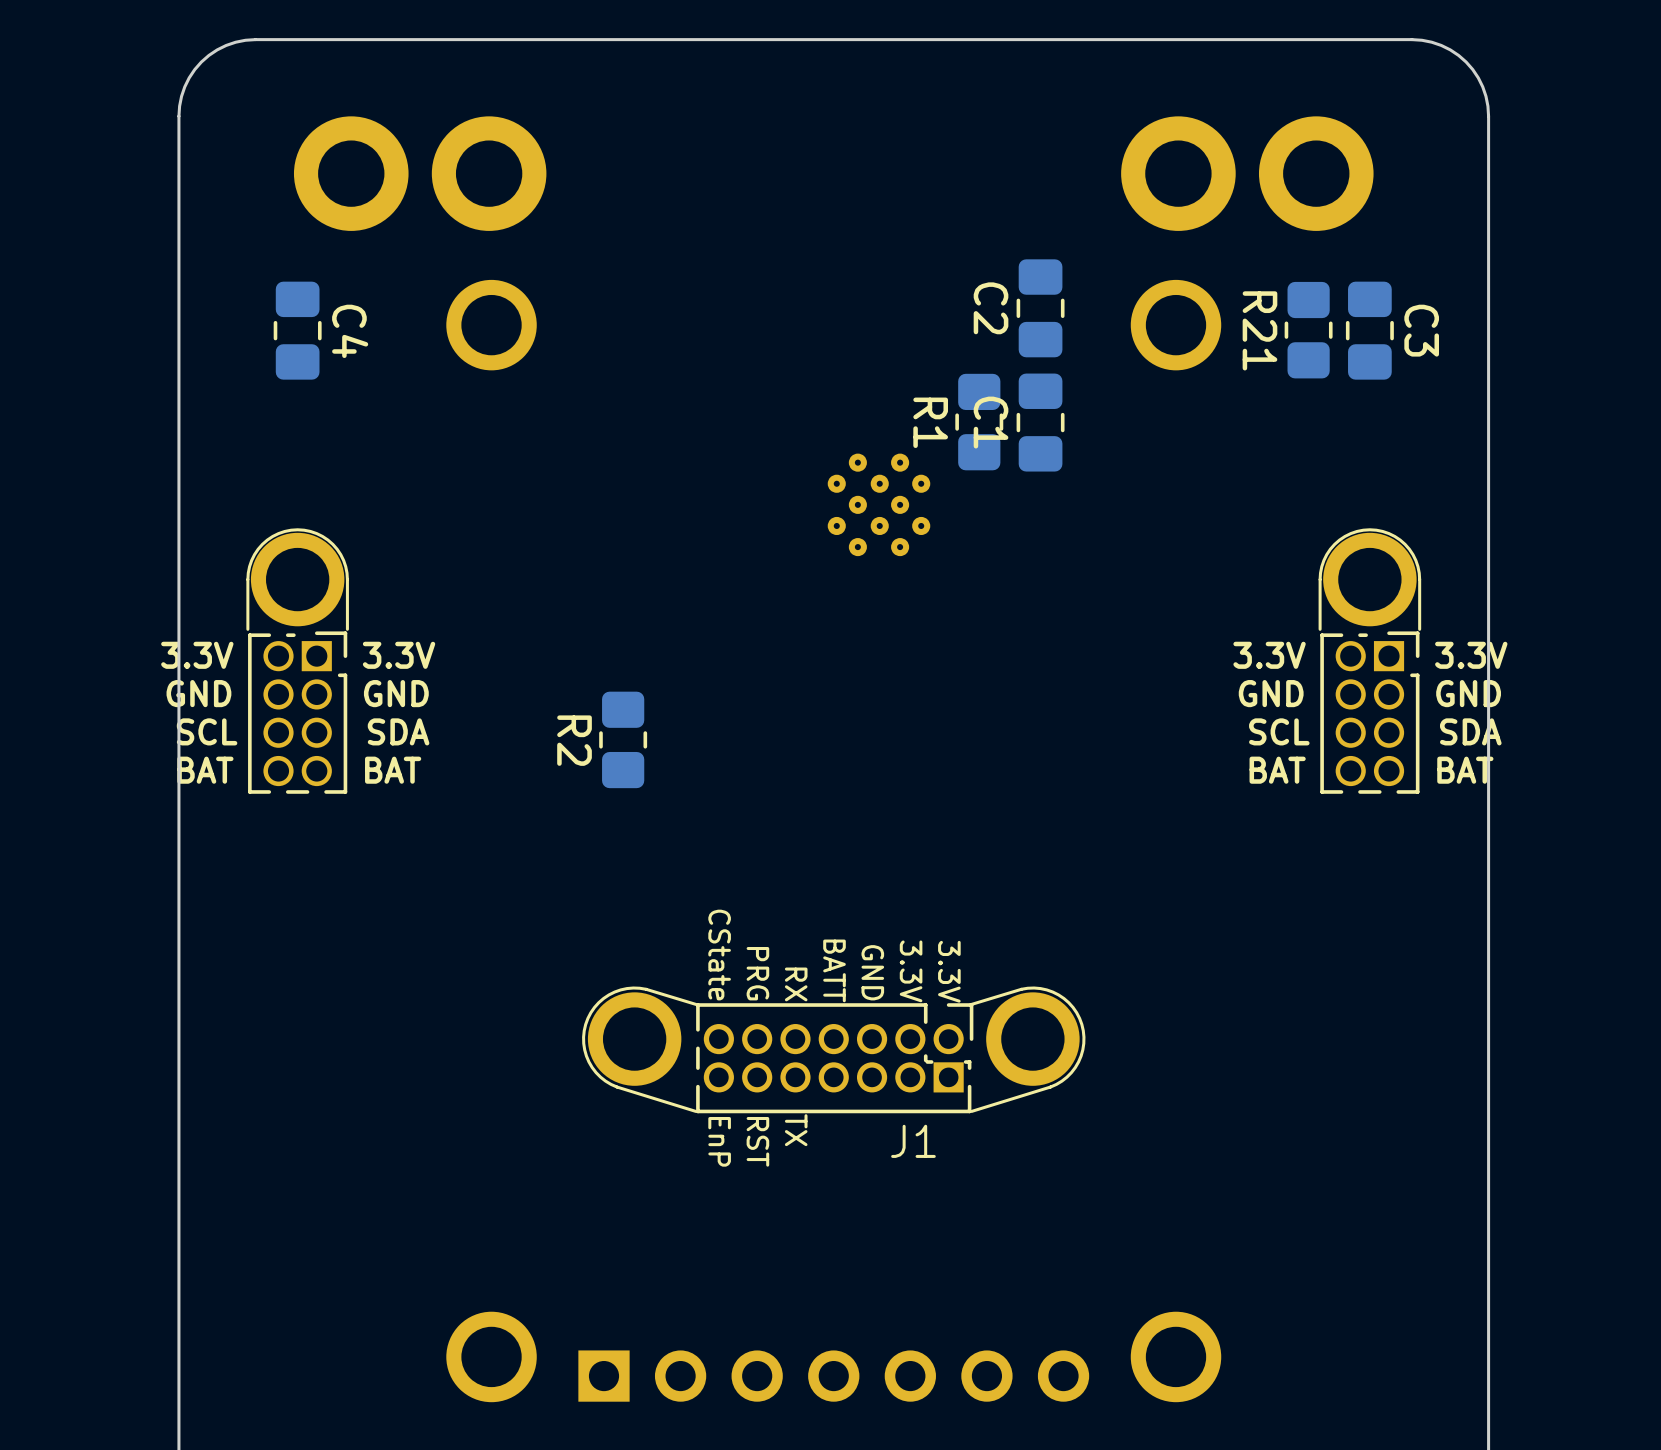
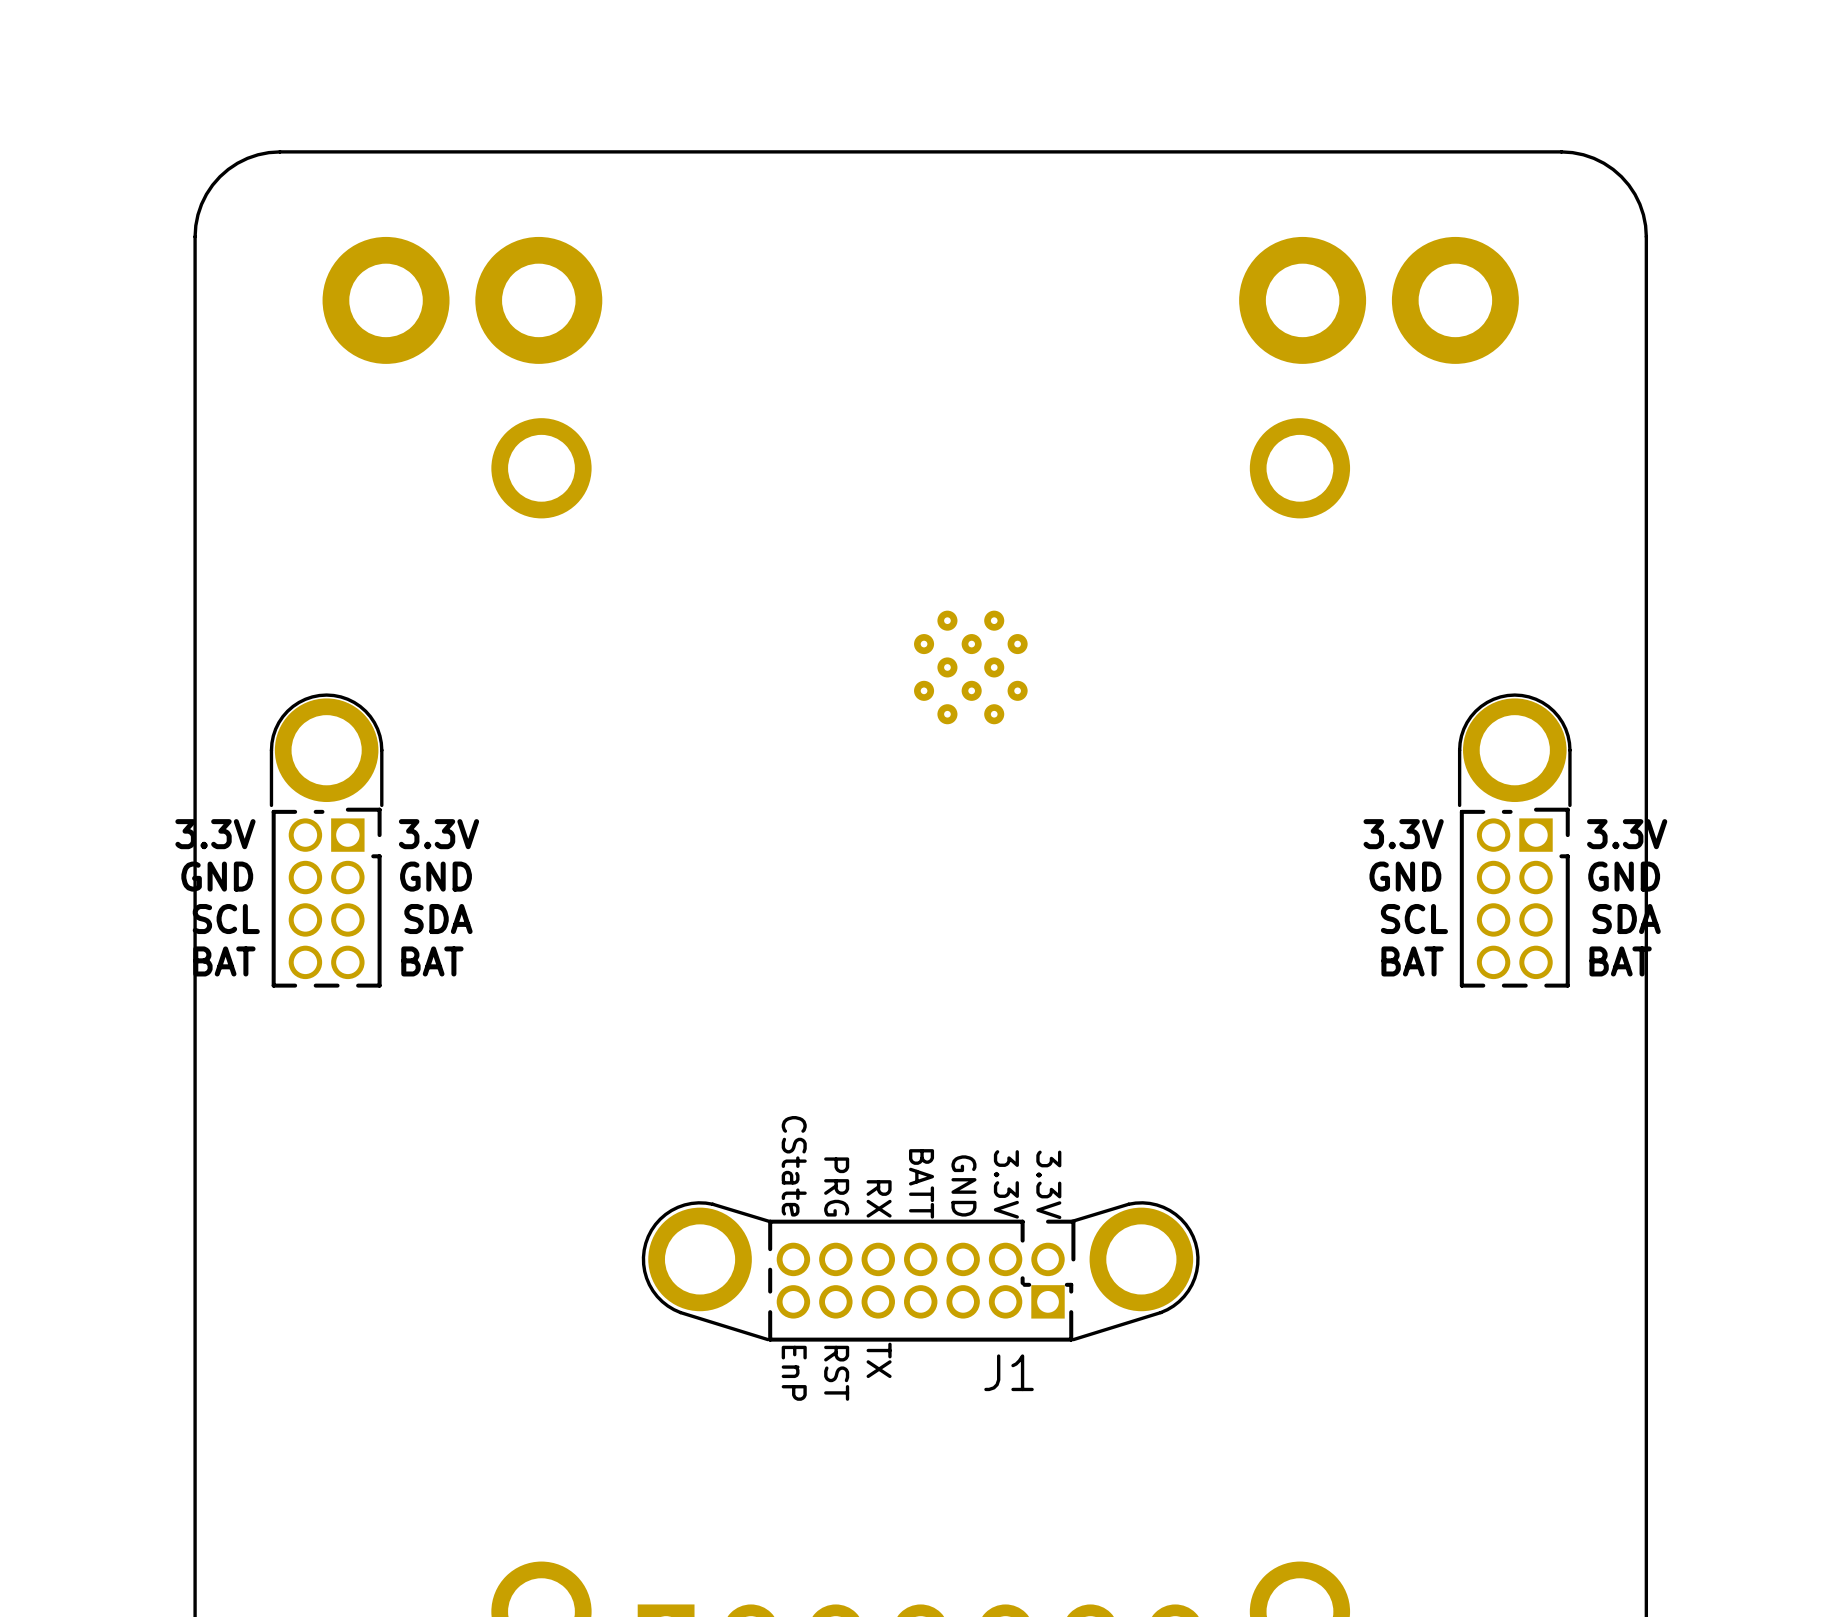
C2: (1040, 308) -> none
C4: (297, 330) -> none
R21: (1308, 330) -> none
C3: (1369, 330) -> none
R1: (979, 422) -> none
C1: (1040, 422) -> none
R2: (623, 739) -> none

